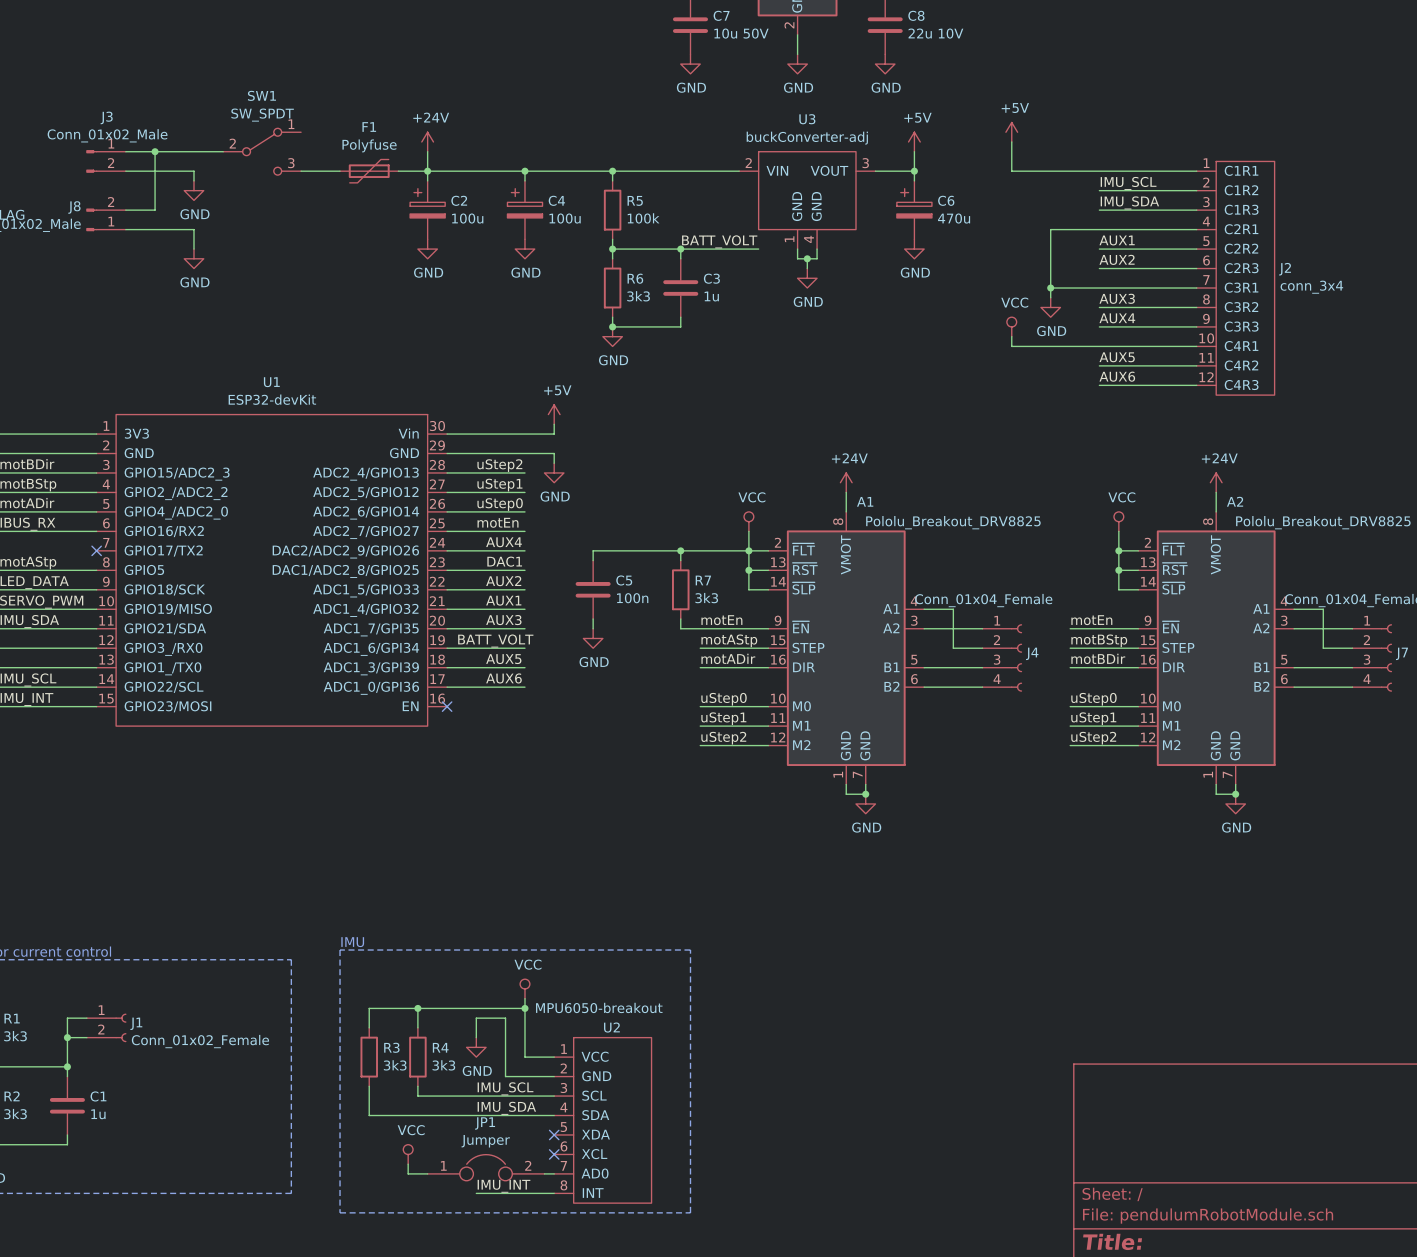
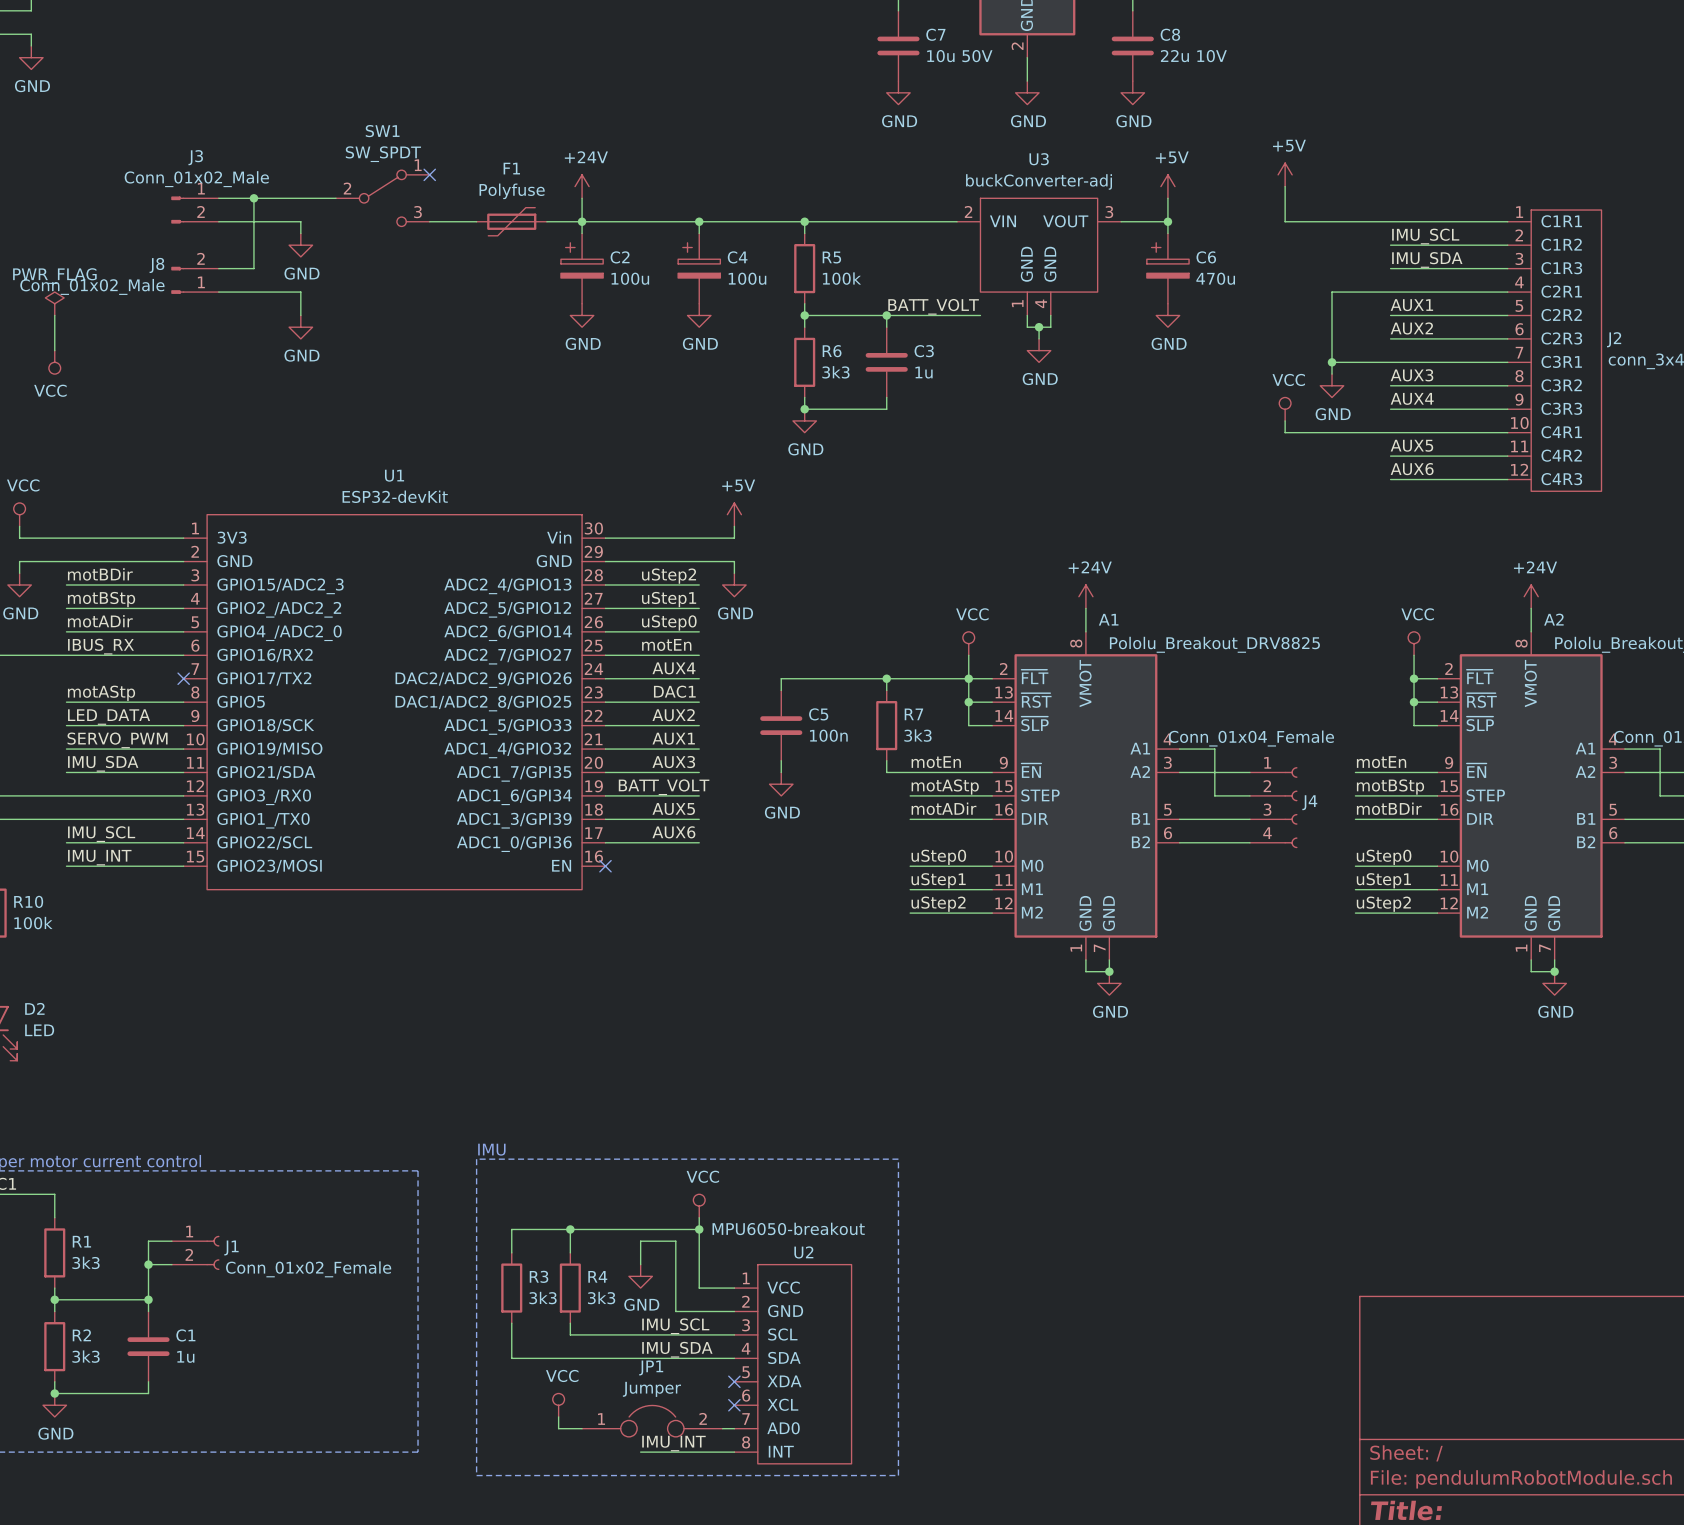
no-connect mark: none -> (429, 174)

